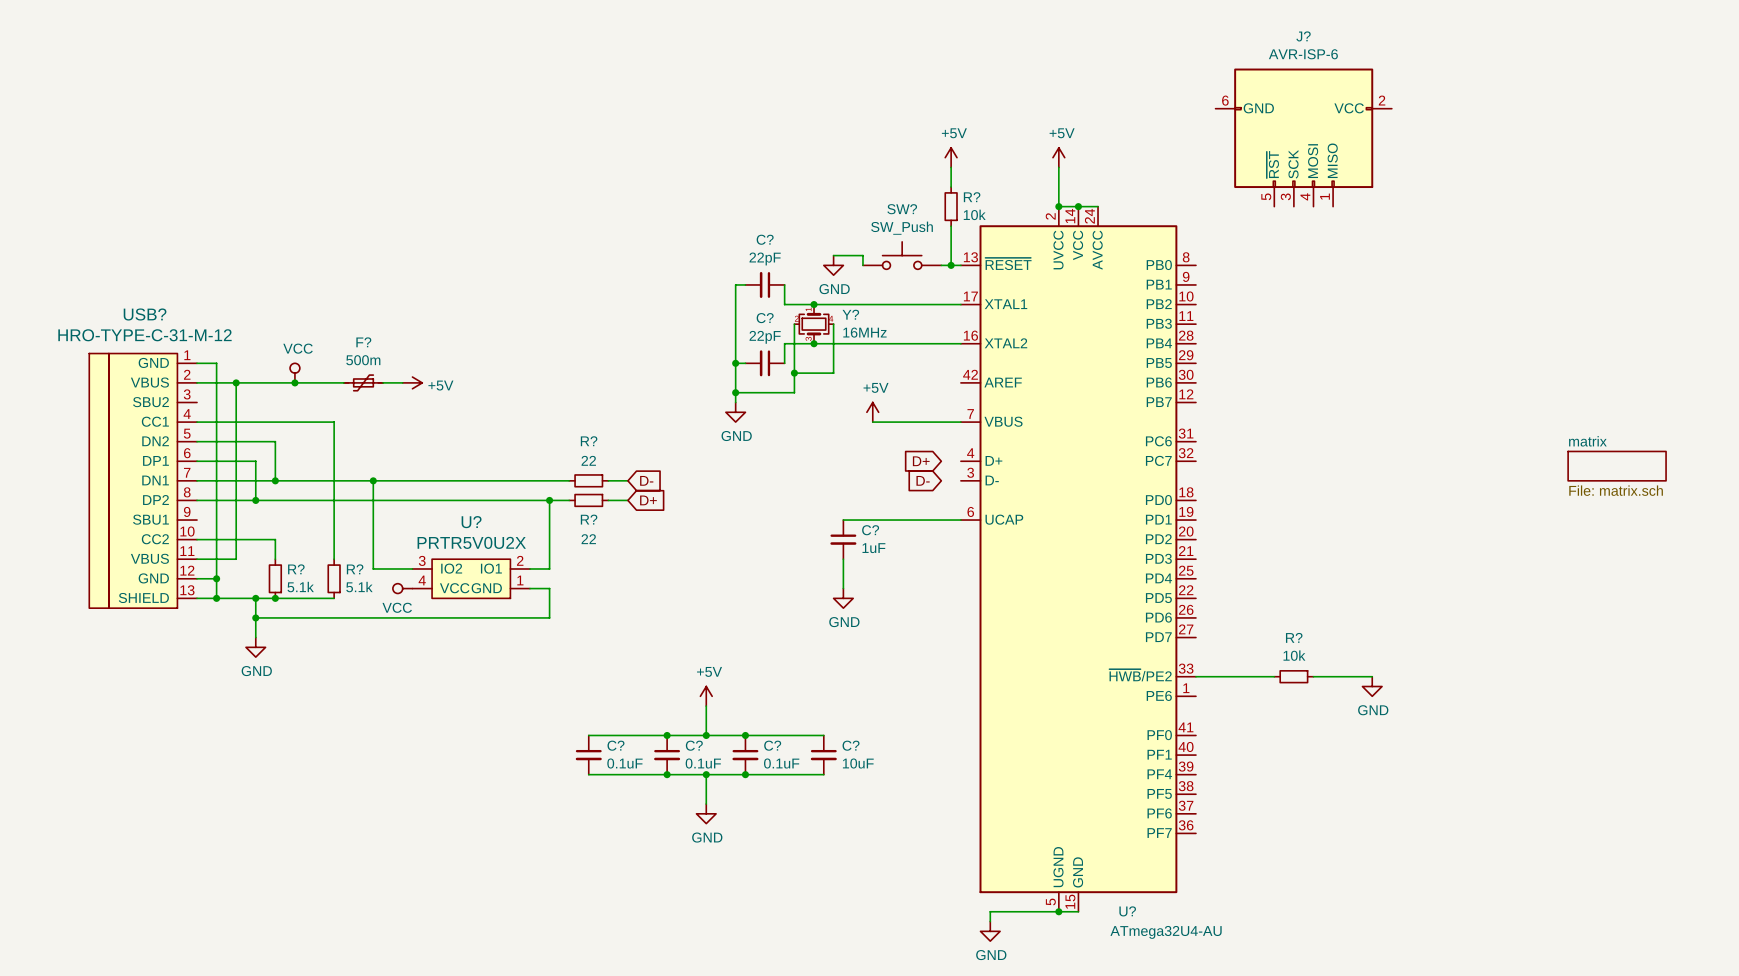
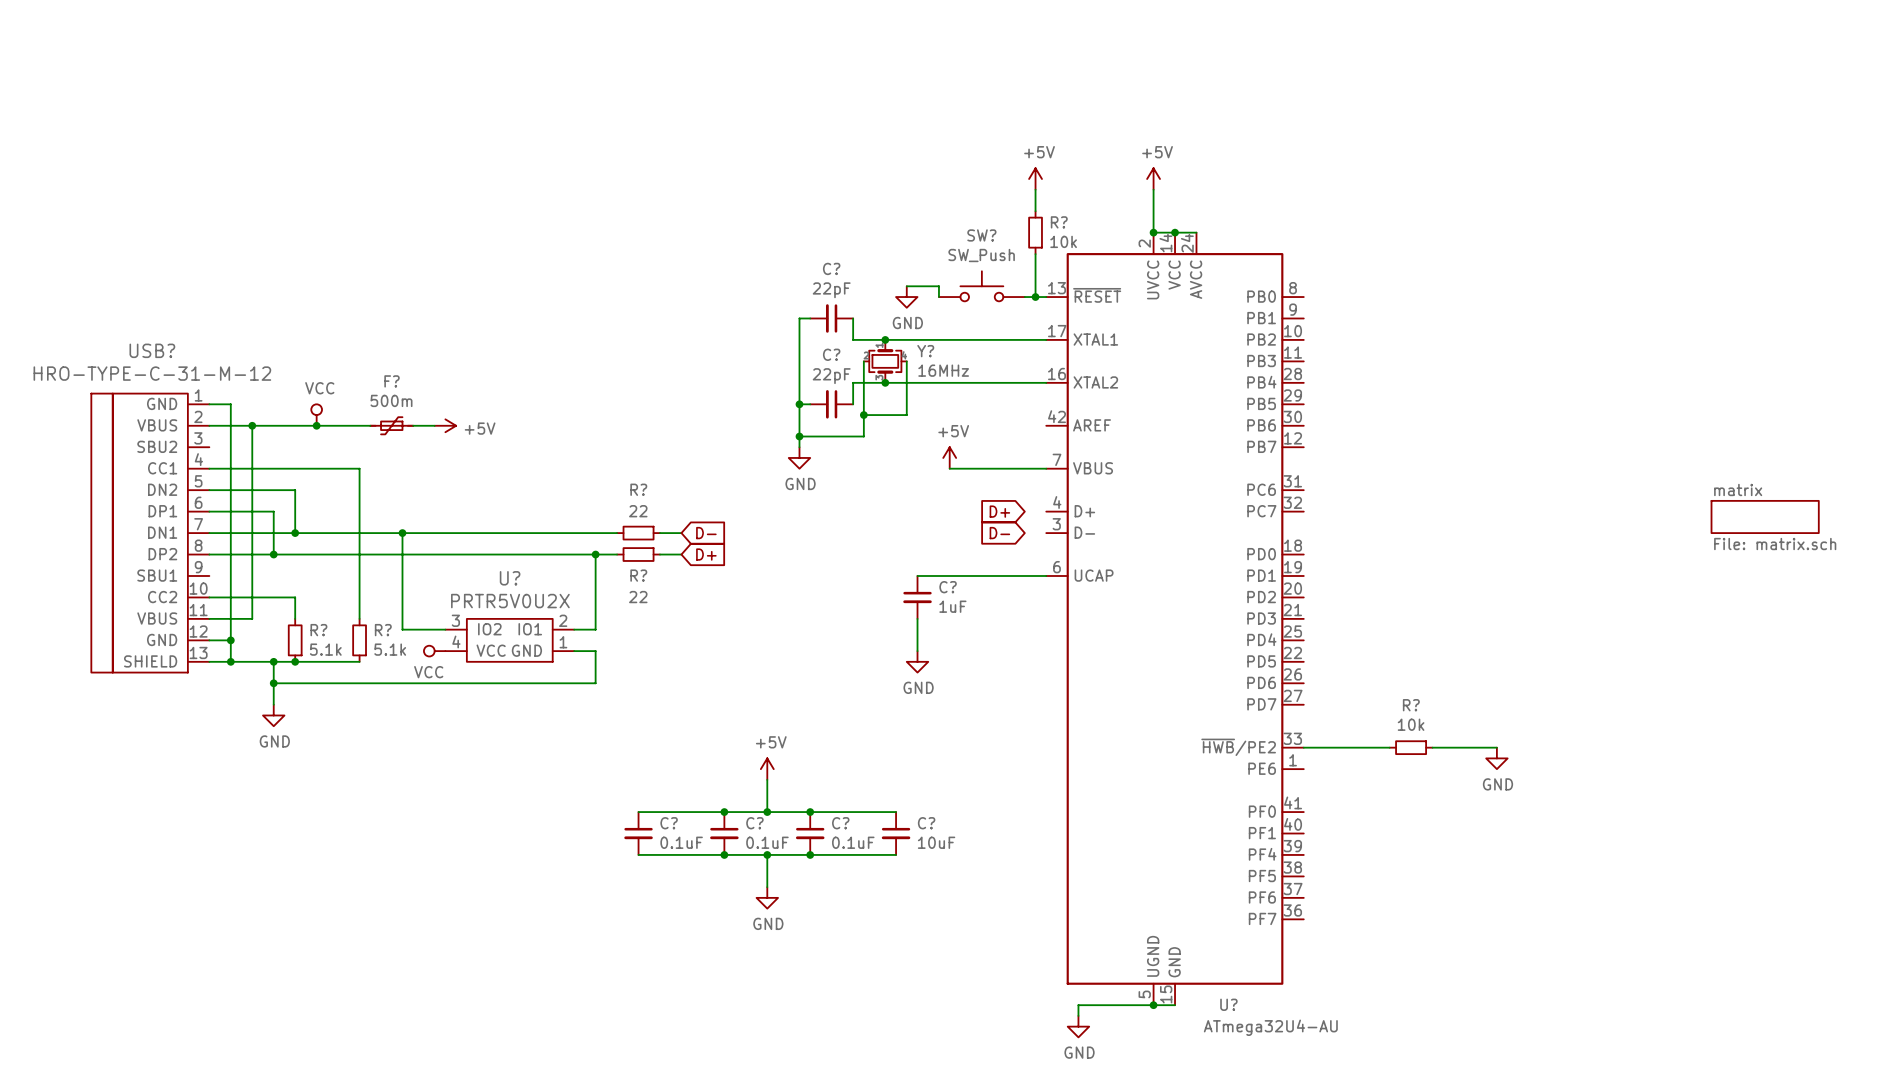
J?: AVR-ISP-6 (1303, 137) -> none

